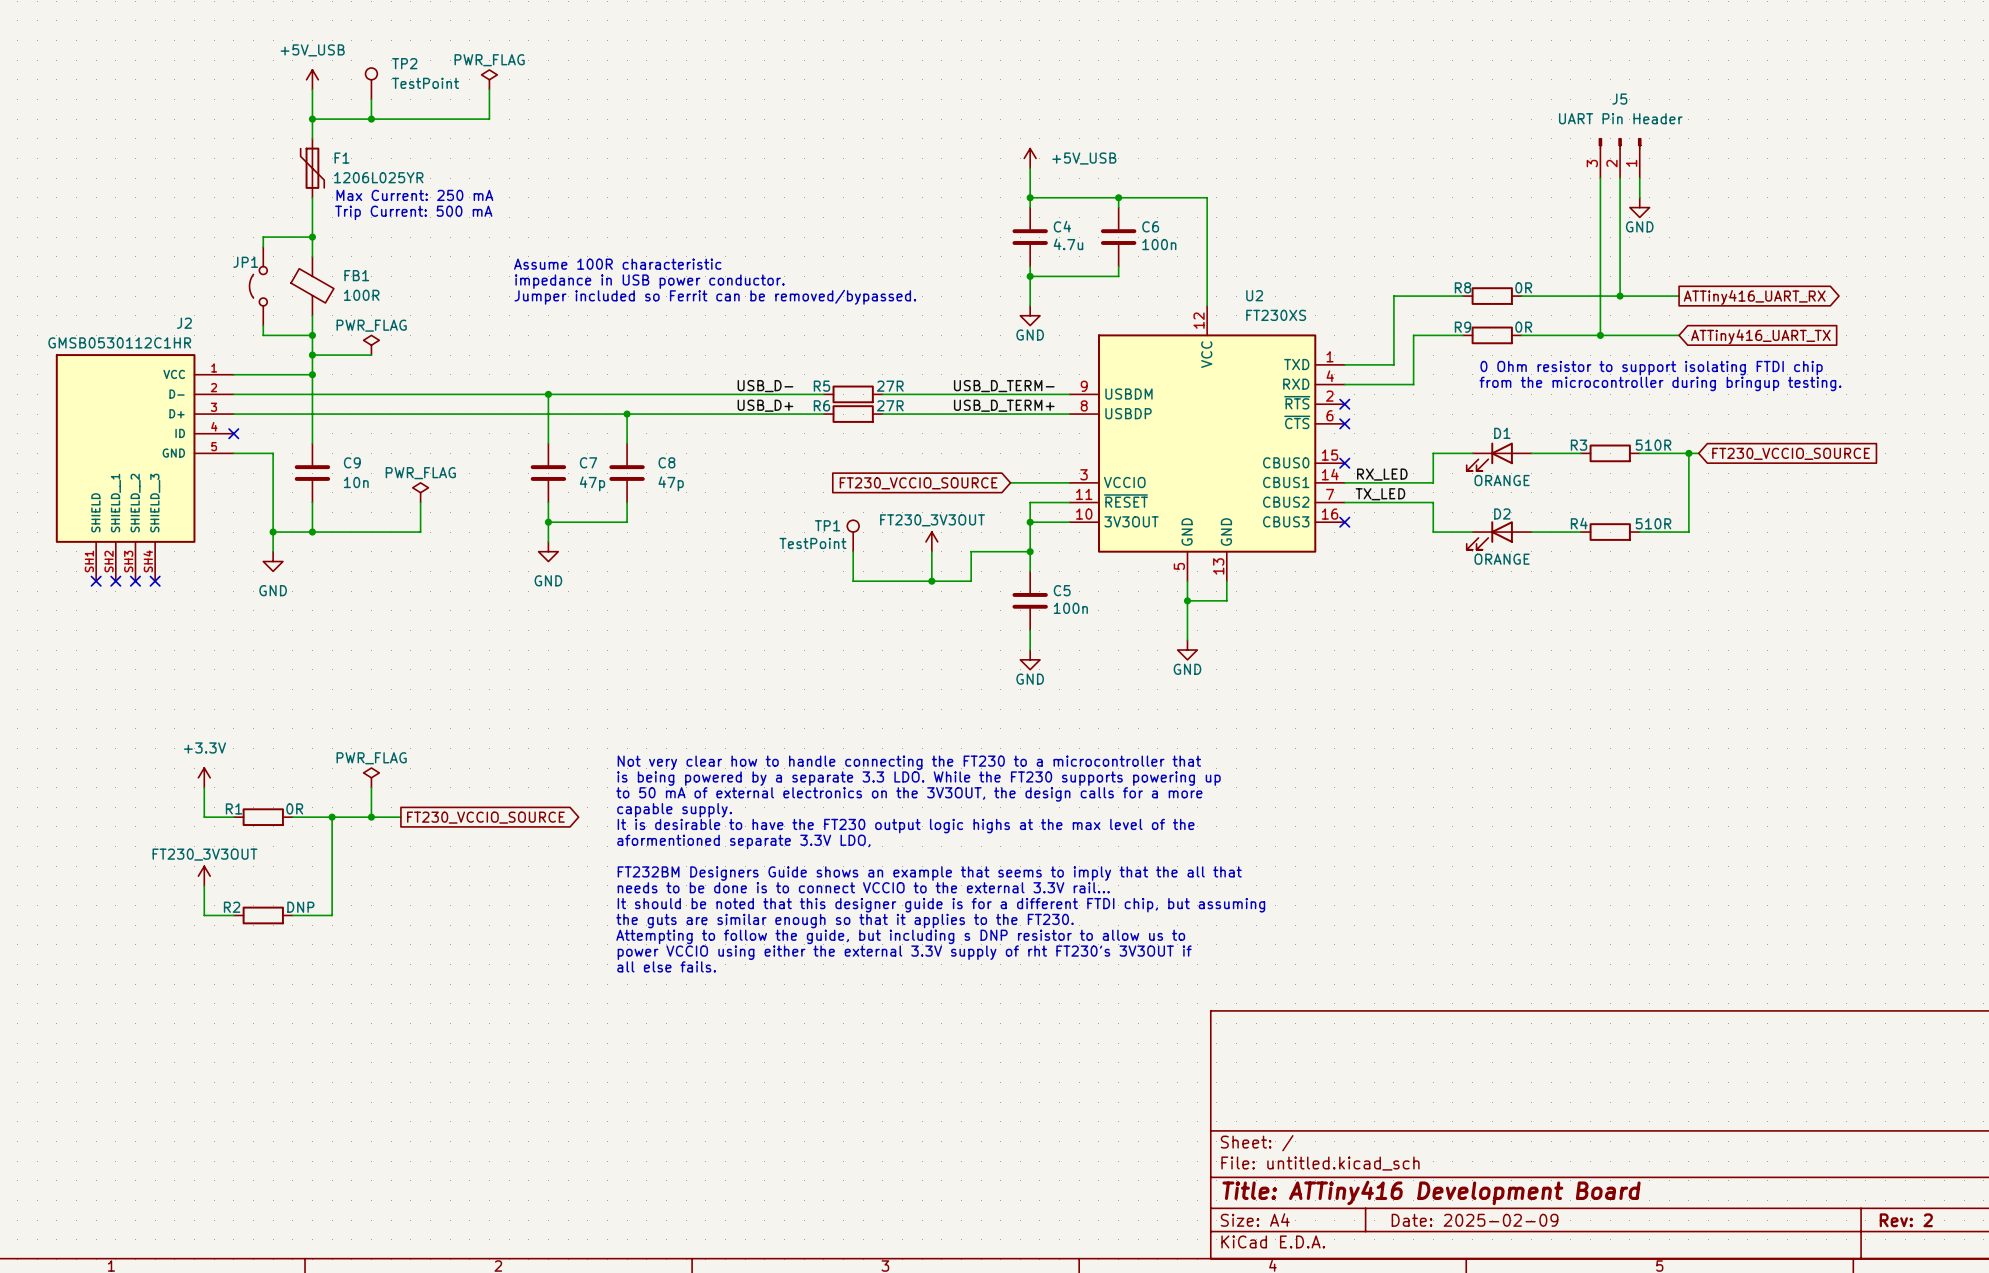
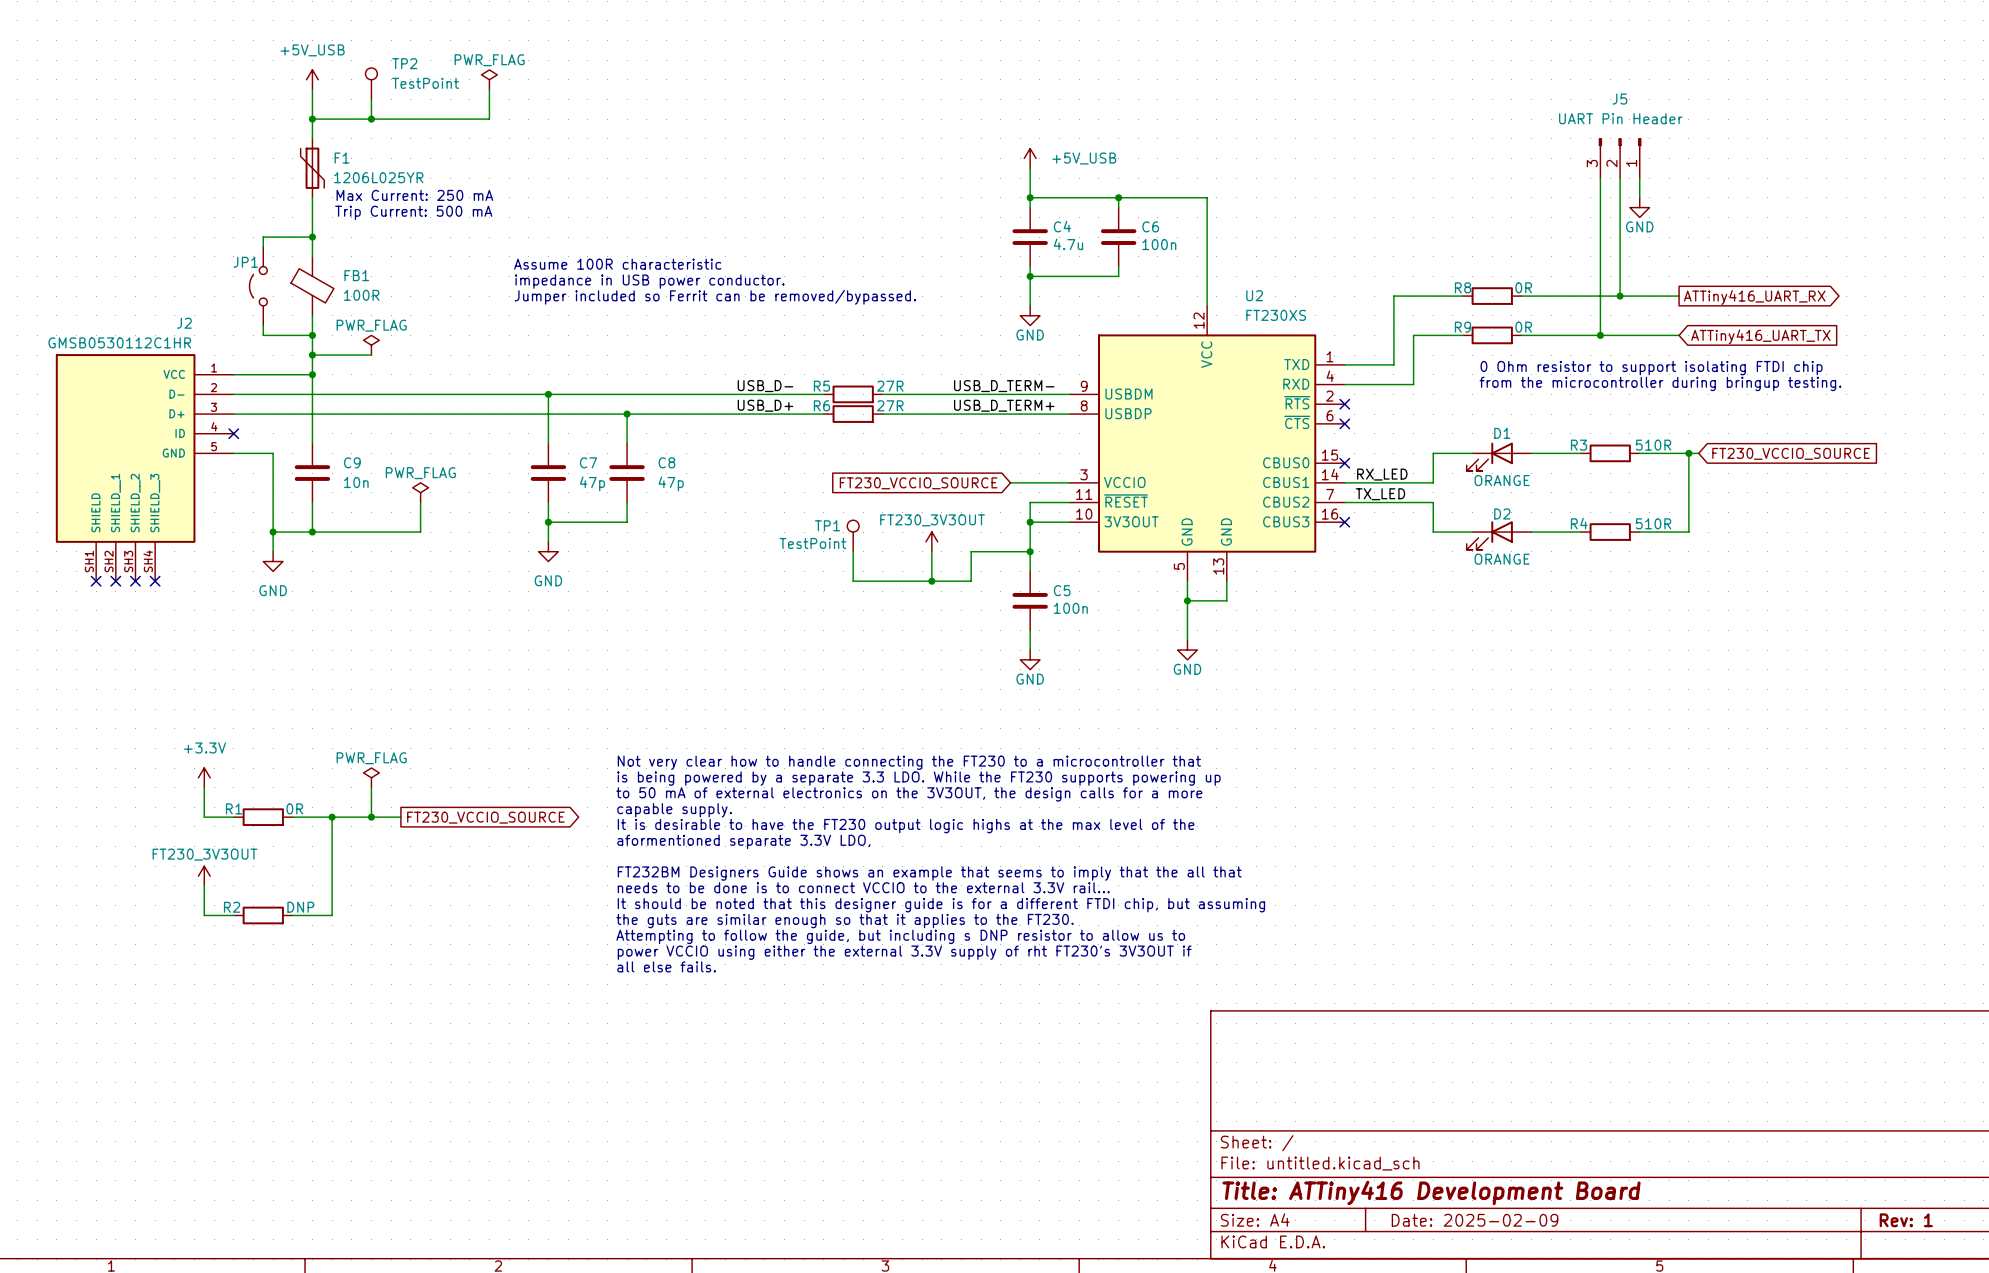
title block: Rev: 2 (1906, 1220) -> Rev: 1 (1906, 1220)

